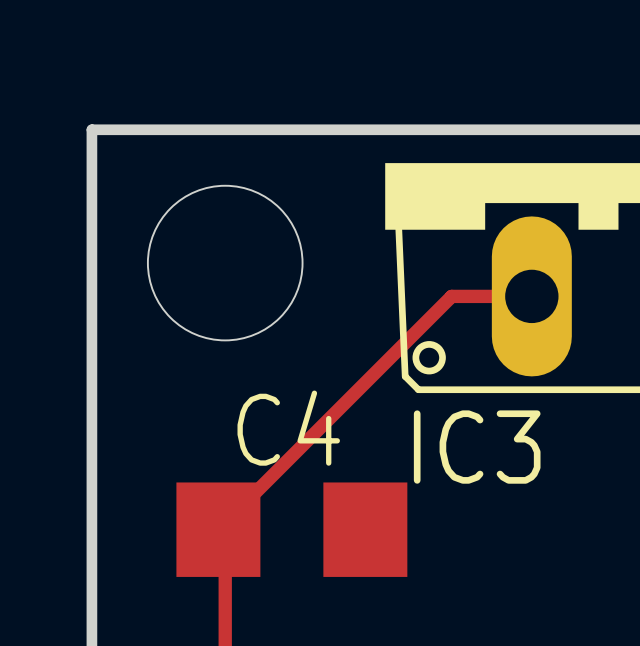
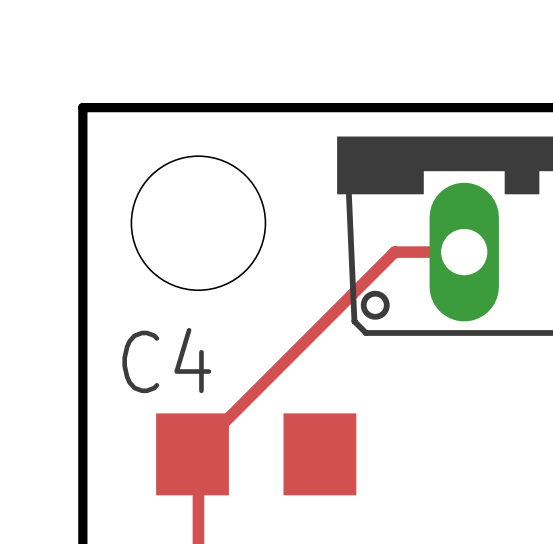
C4 name position: C4 (288, 428) -> C4 (166, 360)
IC3 name: IC3 (477, 447) -> none

